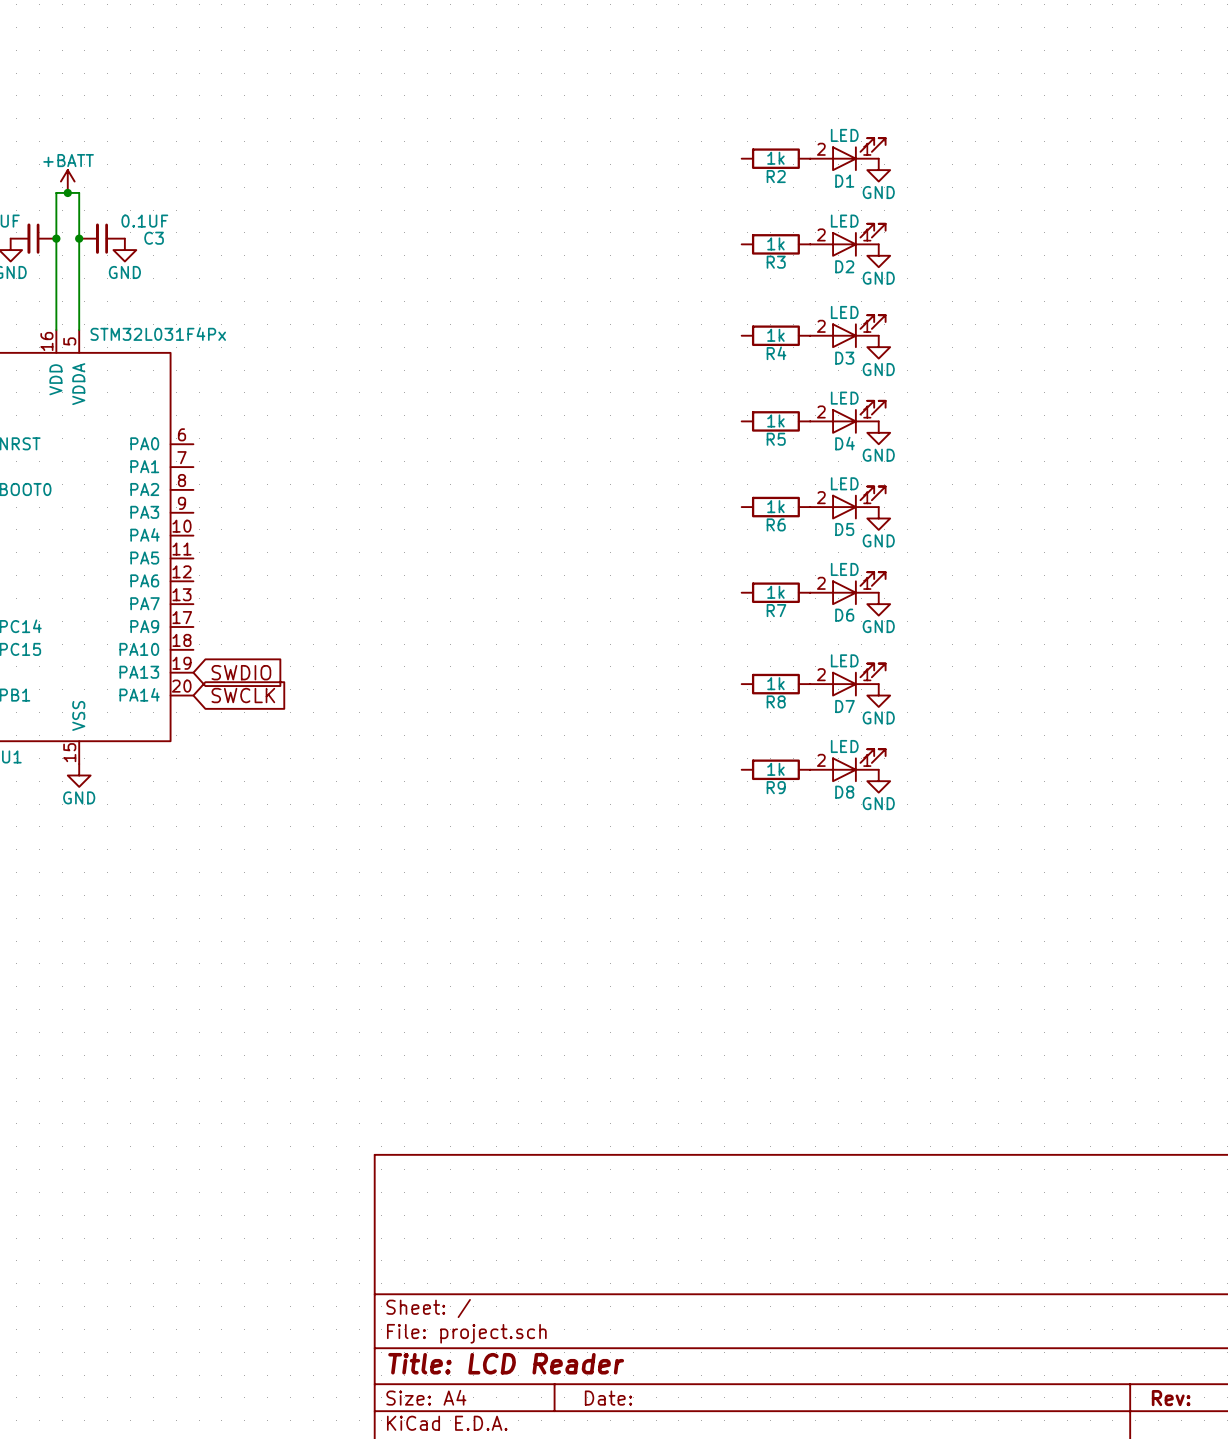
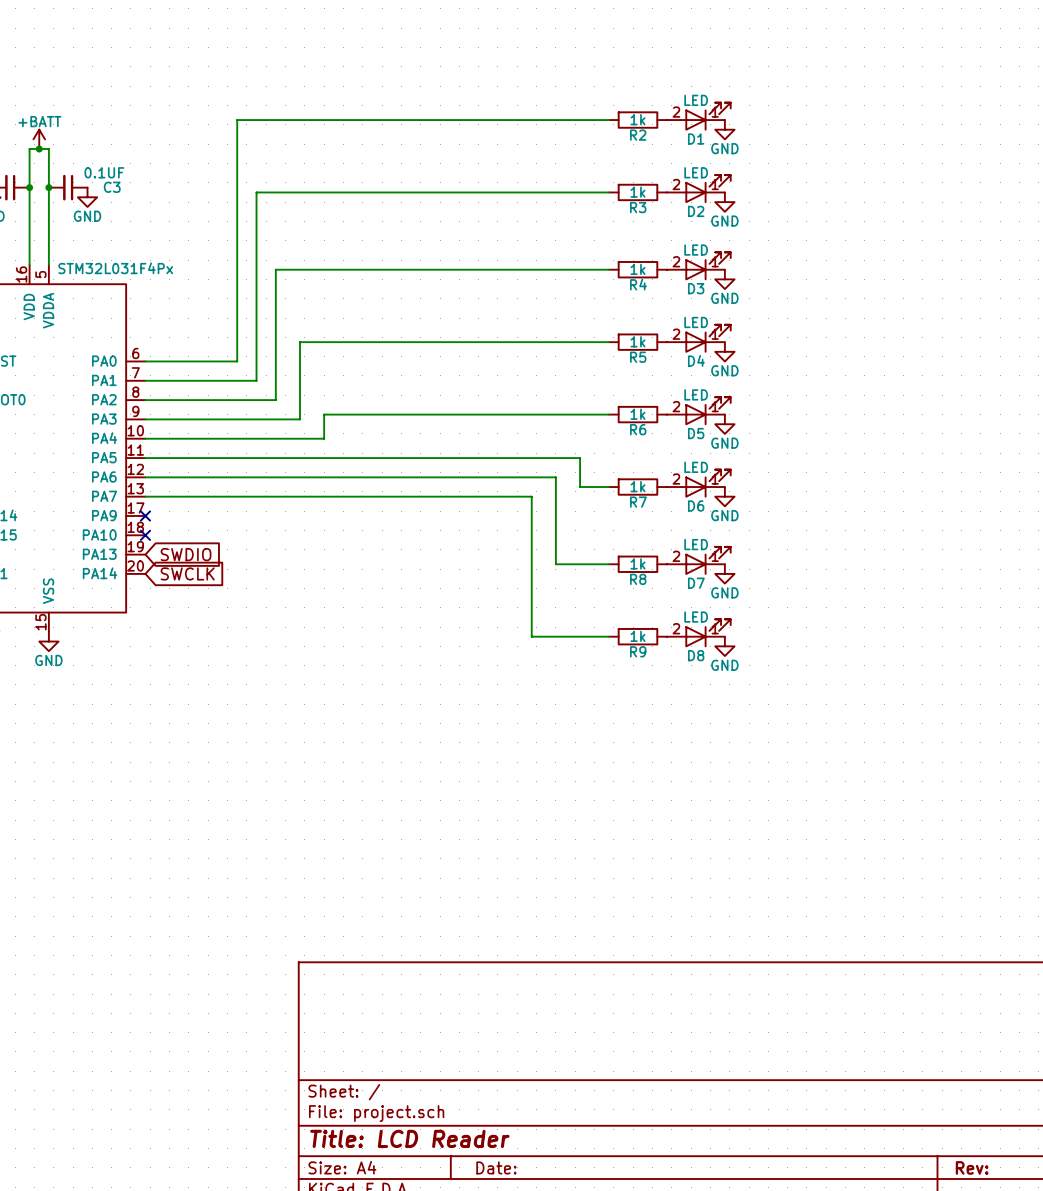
wire: none -> (609, 120) (237, 120) (237, 361) (145, 361)
wire: none -> (609, 192) (256, 192) (256, 380) (145, 380)
wire: none -> (609, 269) (275, 269) (275, 400) (145, 400)
wire: none -> (609, 342) (299, 342) (299, 419) (145, 419)
wire: none -> (609, 414) (324, 414) (324, 438) (145, 438)
wire: none -> (145, 458) (580, 458) (580, 487) (609, 487)
wire: none -> (145, 477) (555, 477) (555, 564) (609, 564)
wire: none -> (145, 496) (531, 496) (531, 636) (609, 636)
no-connect mark: none -> (145, 515)
no-connect mark: none -> (145, 535)

